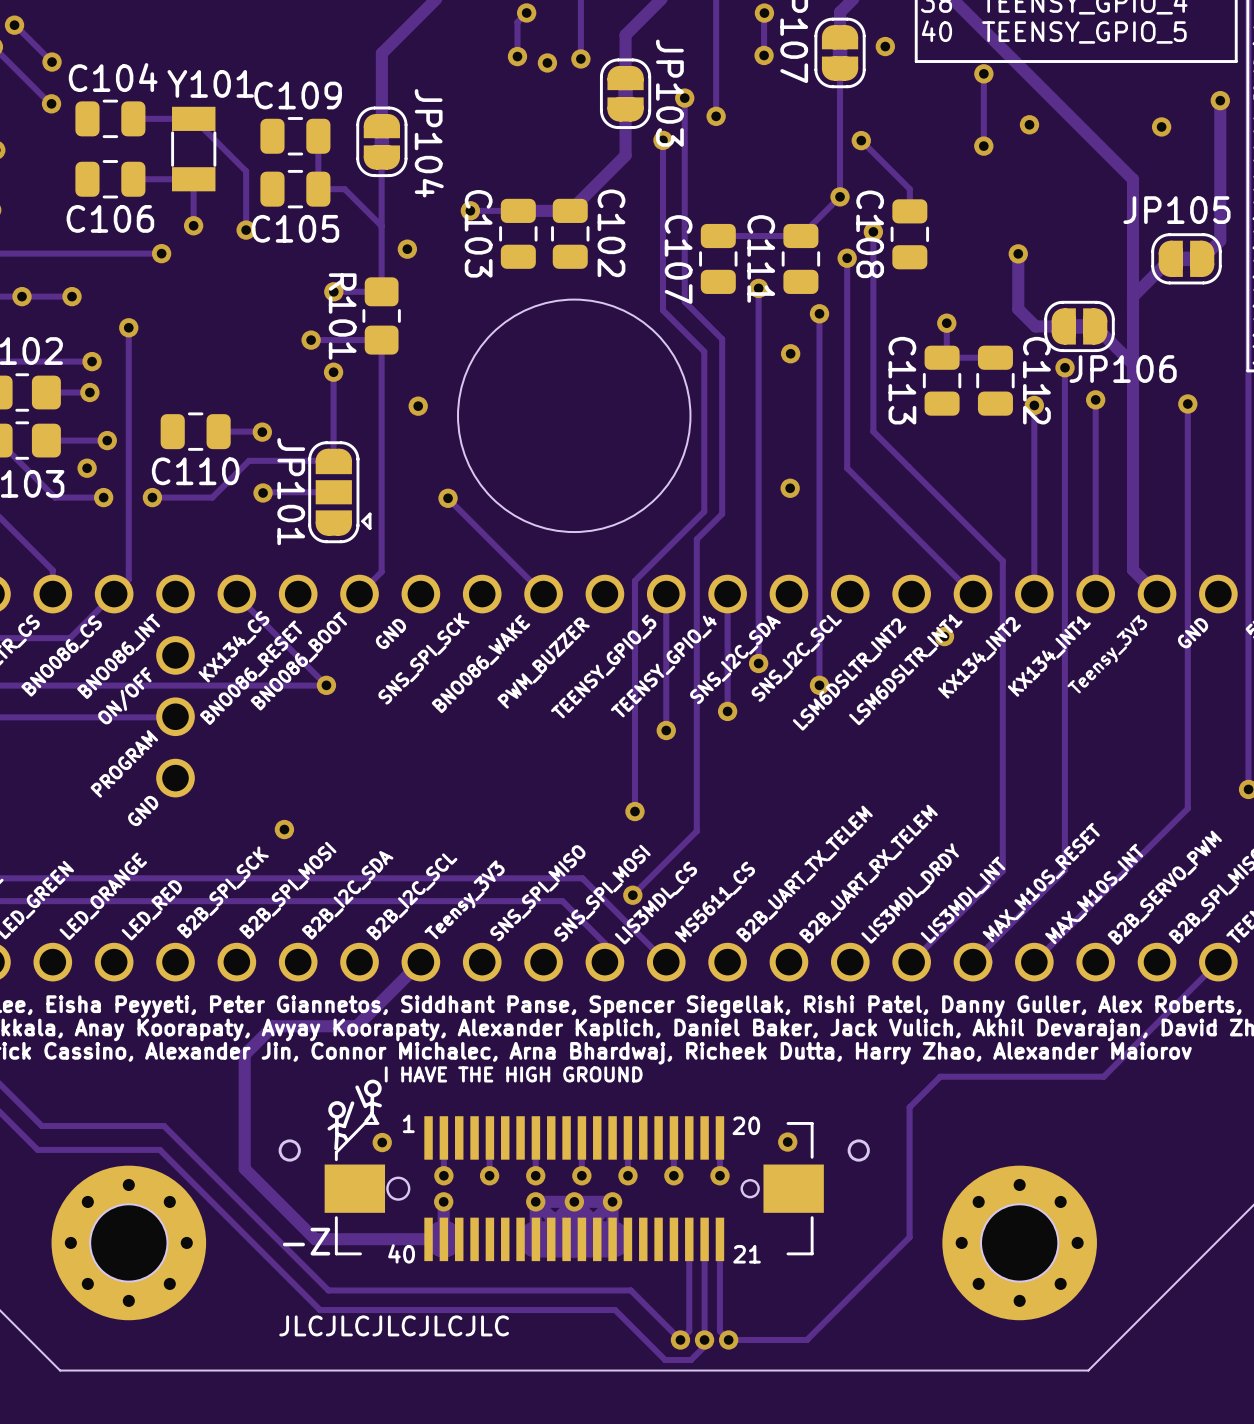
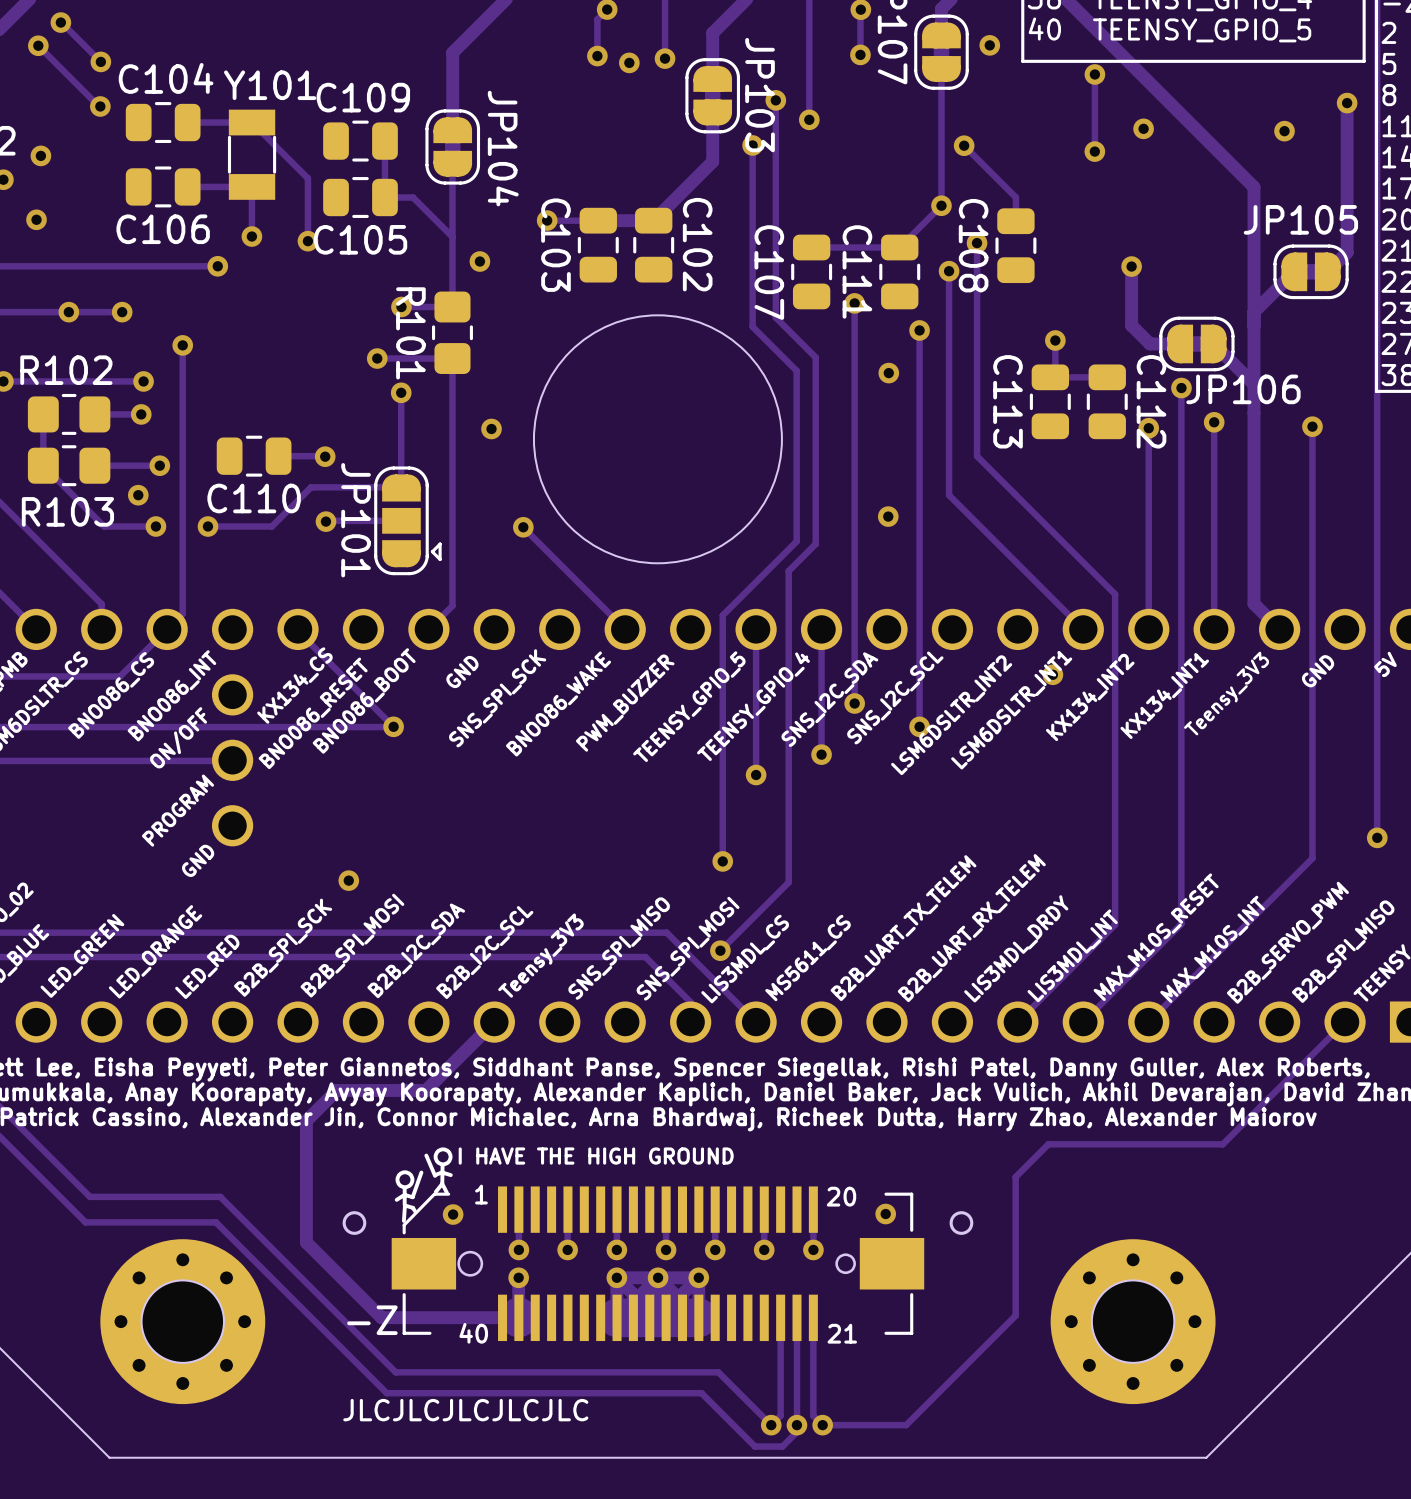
text position: I HAVE THE HIGH GROUND (513, 1074) -> I HAVE THE HIGH GROUND (596, 1156)

